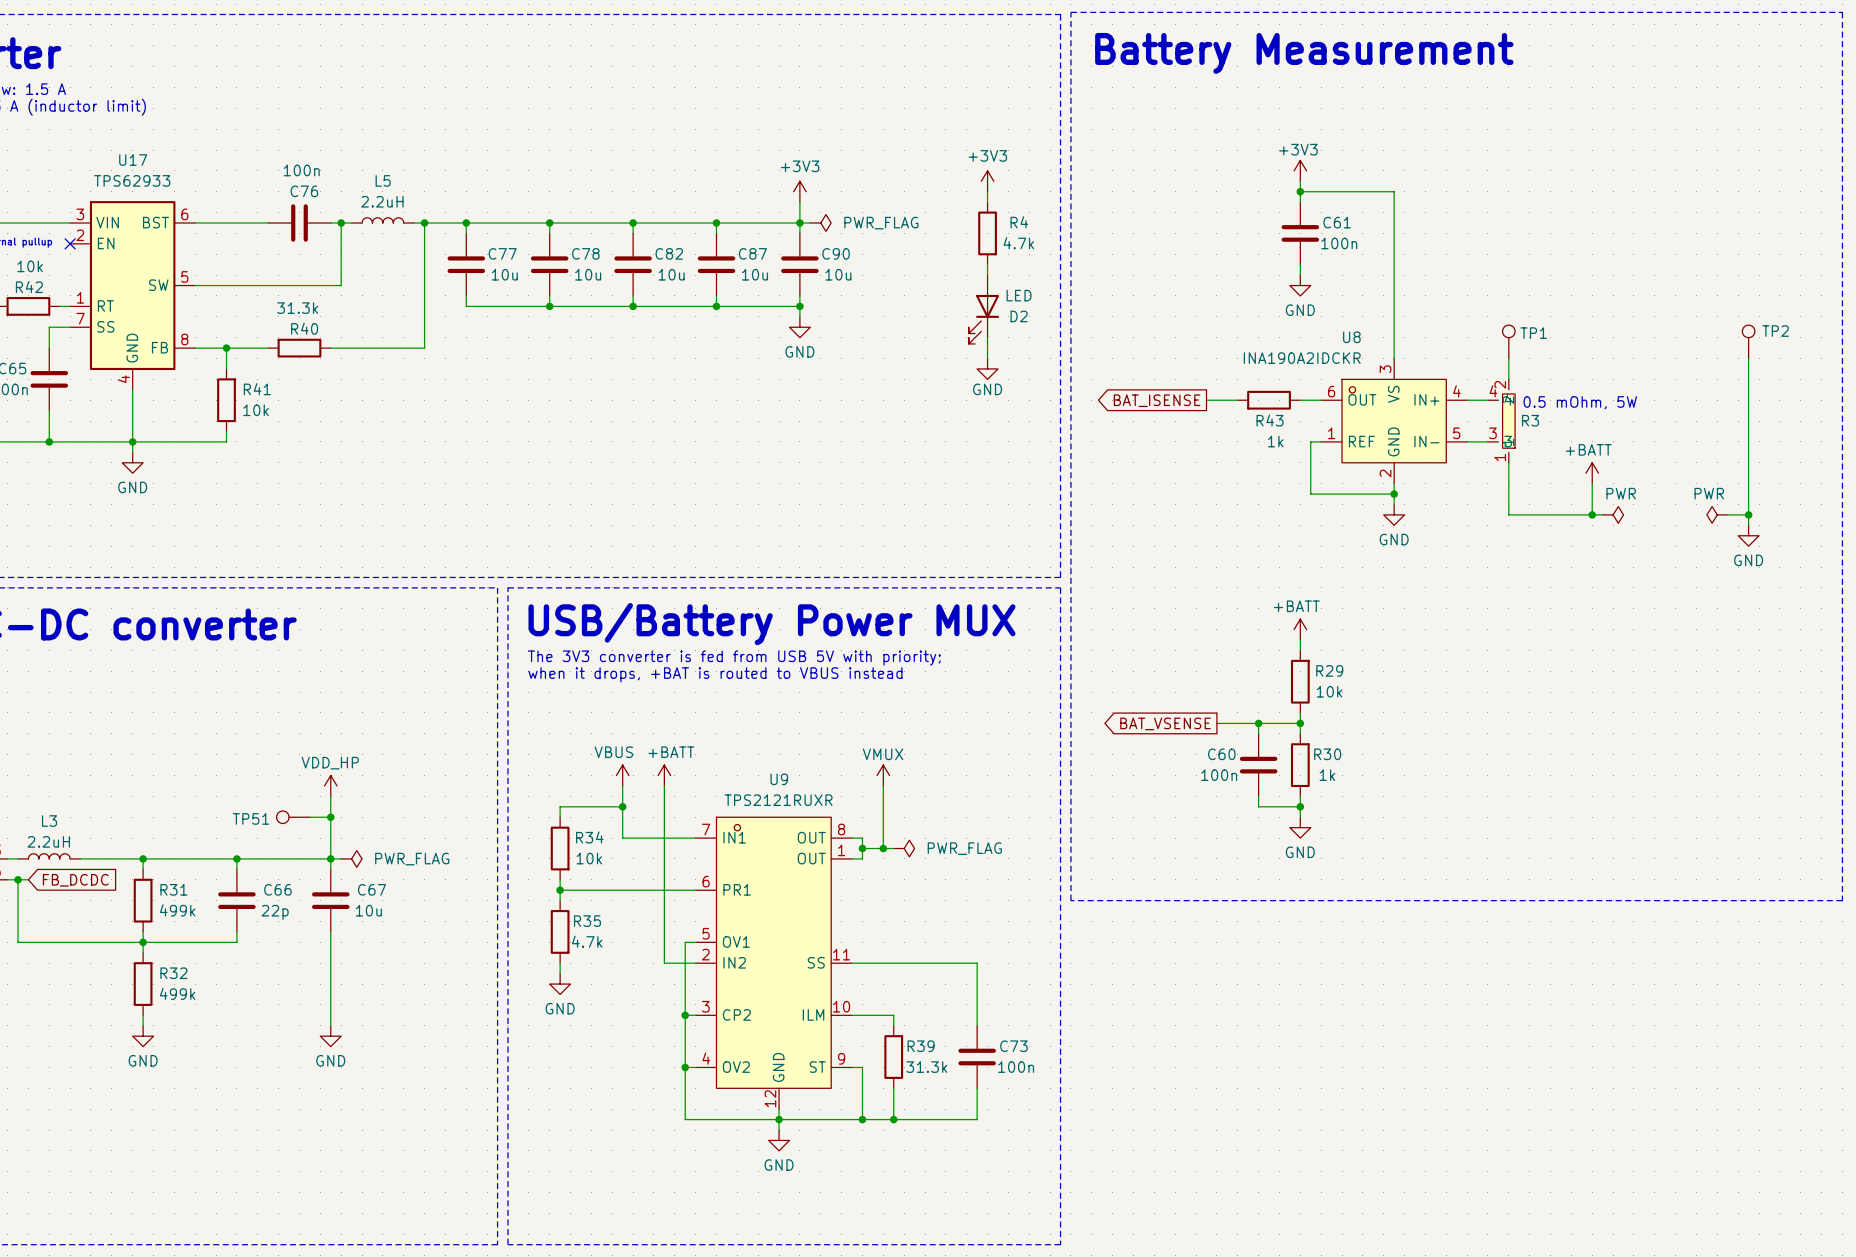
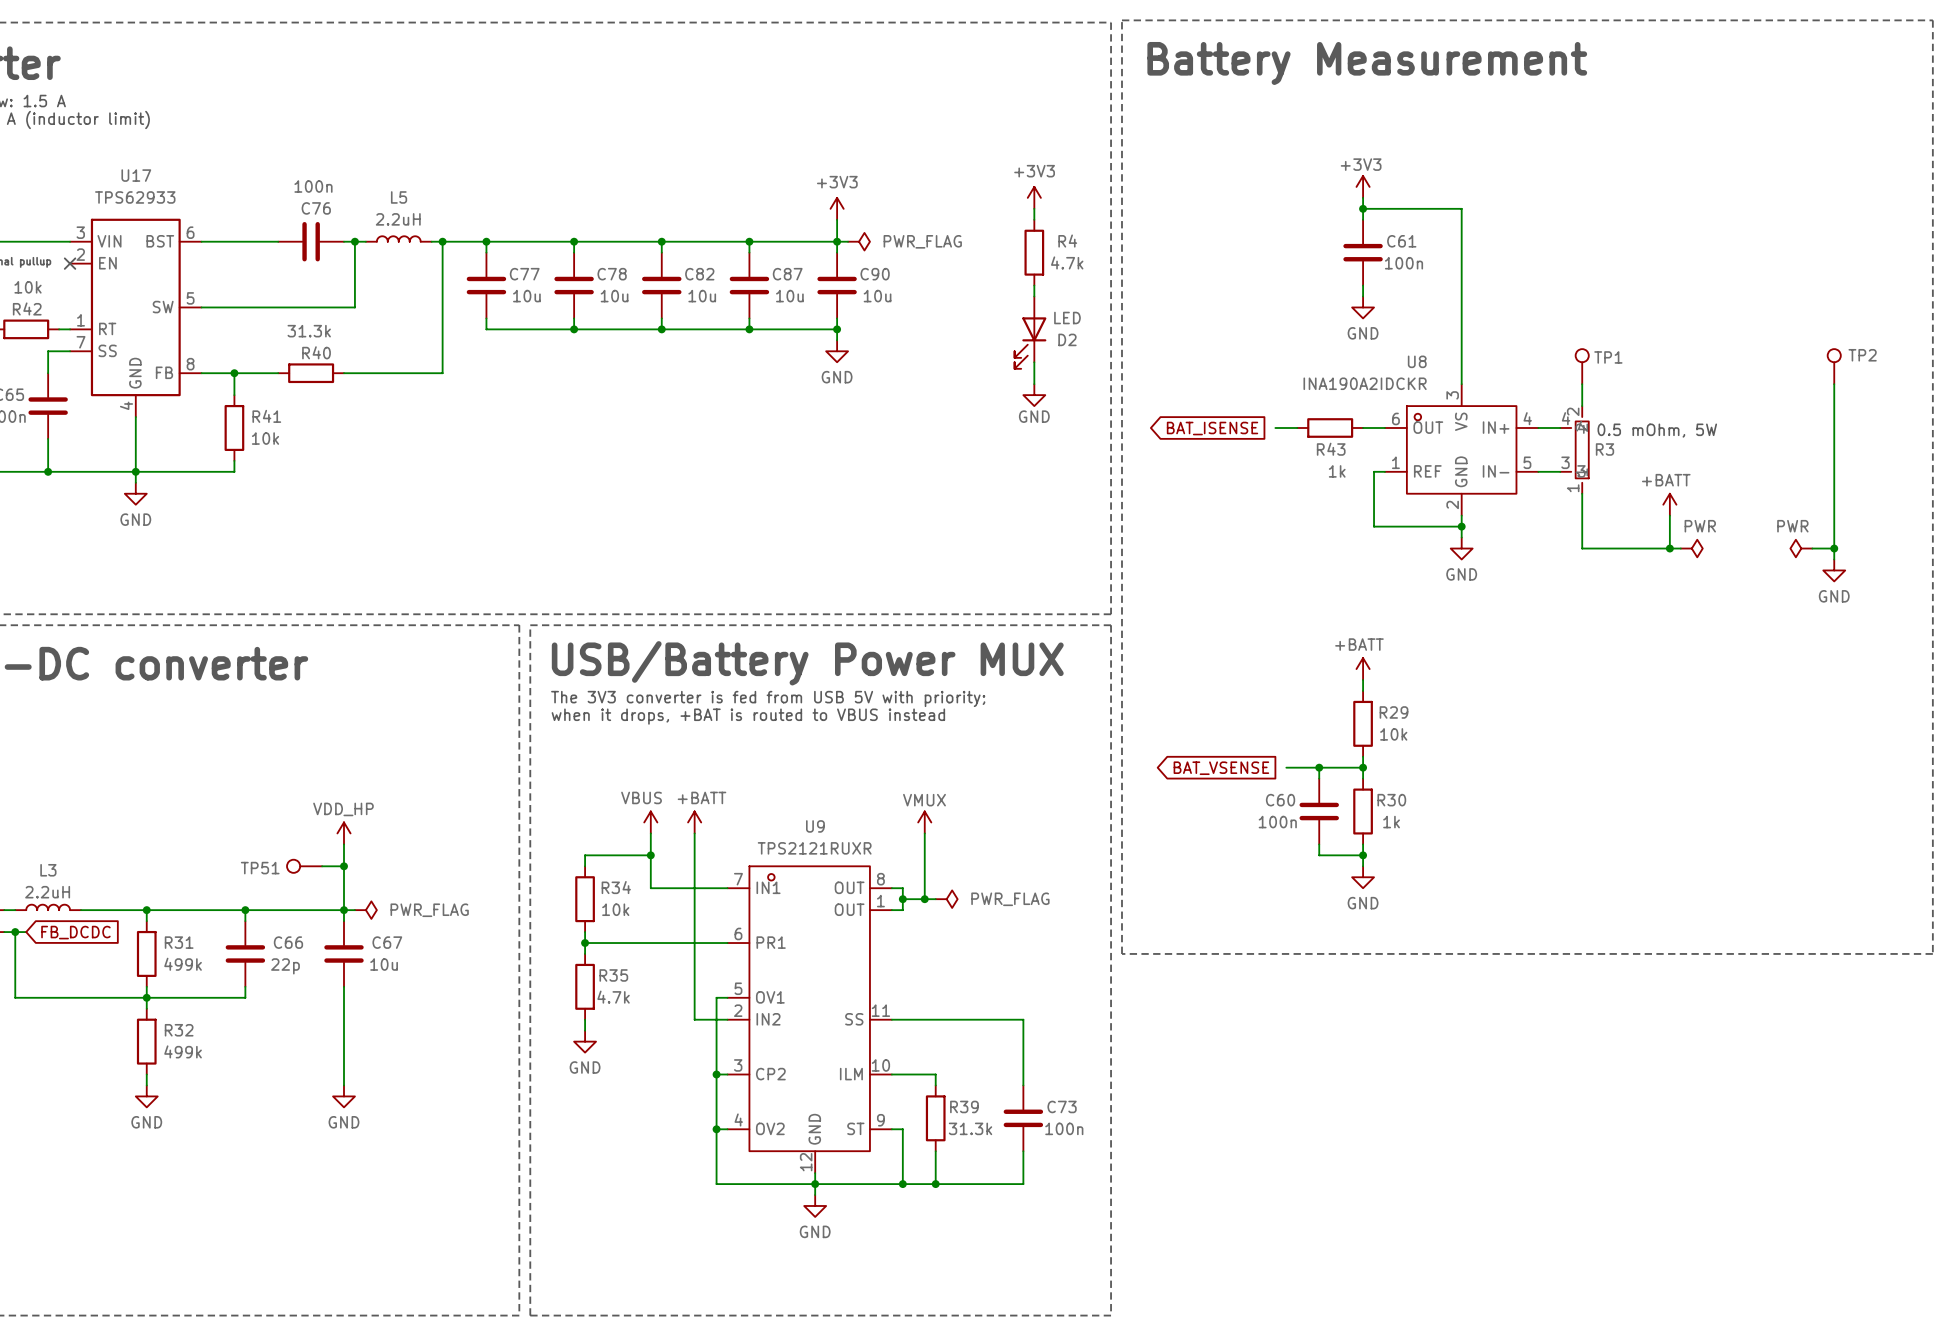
wire: (1206, 400) (1216, 400) -> none
wire: (1216, 723) (1227, 723) -> none

